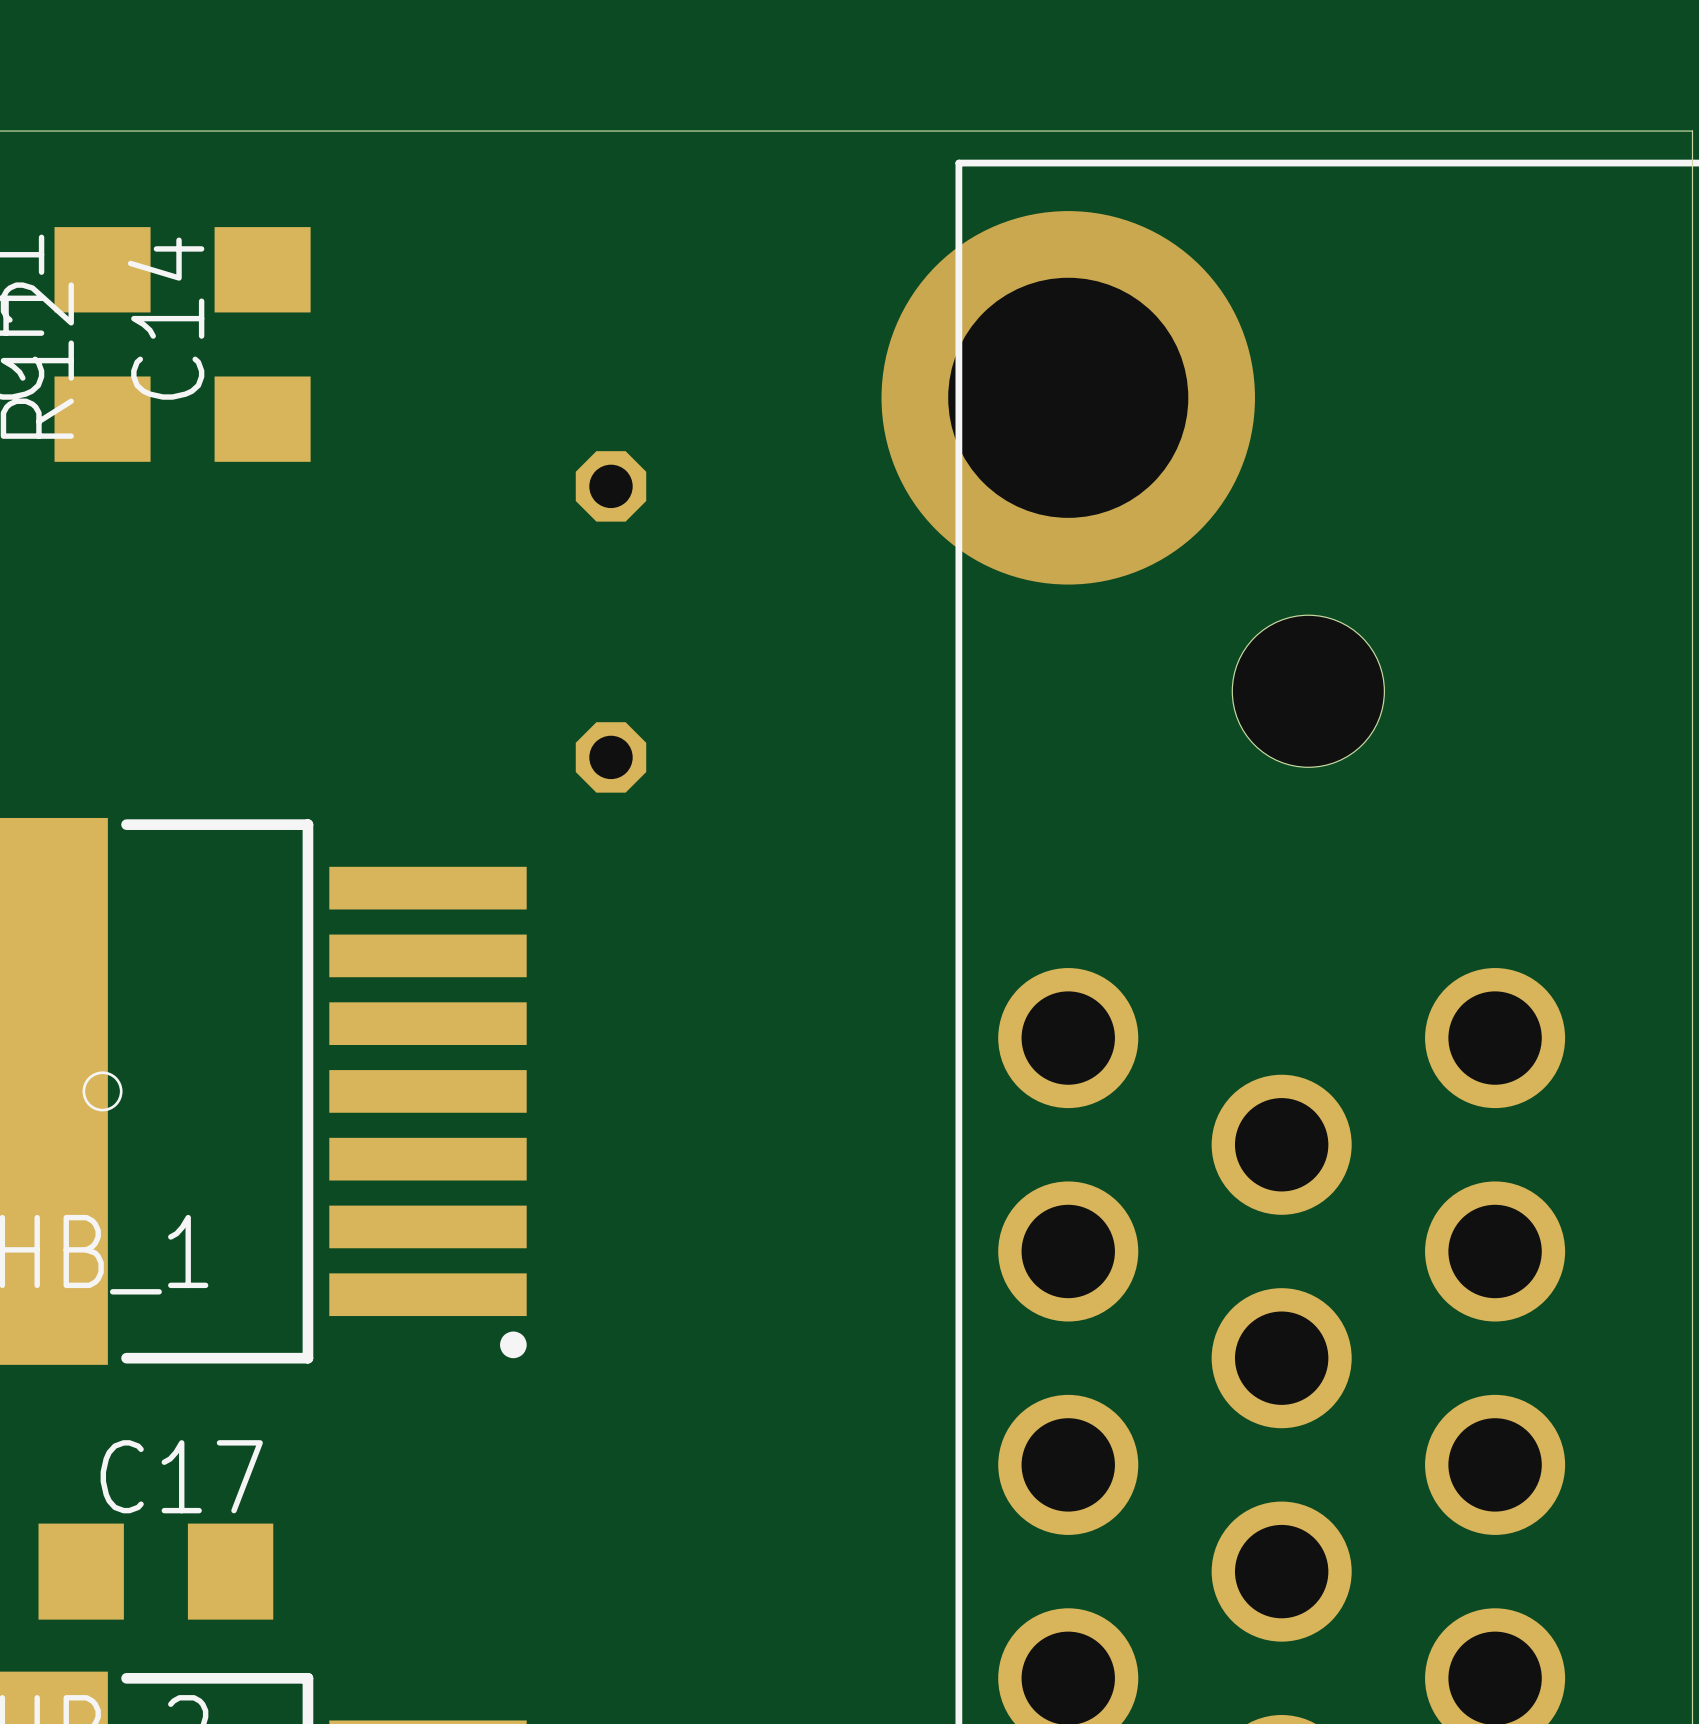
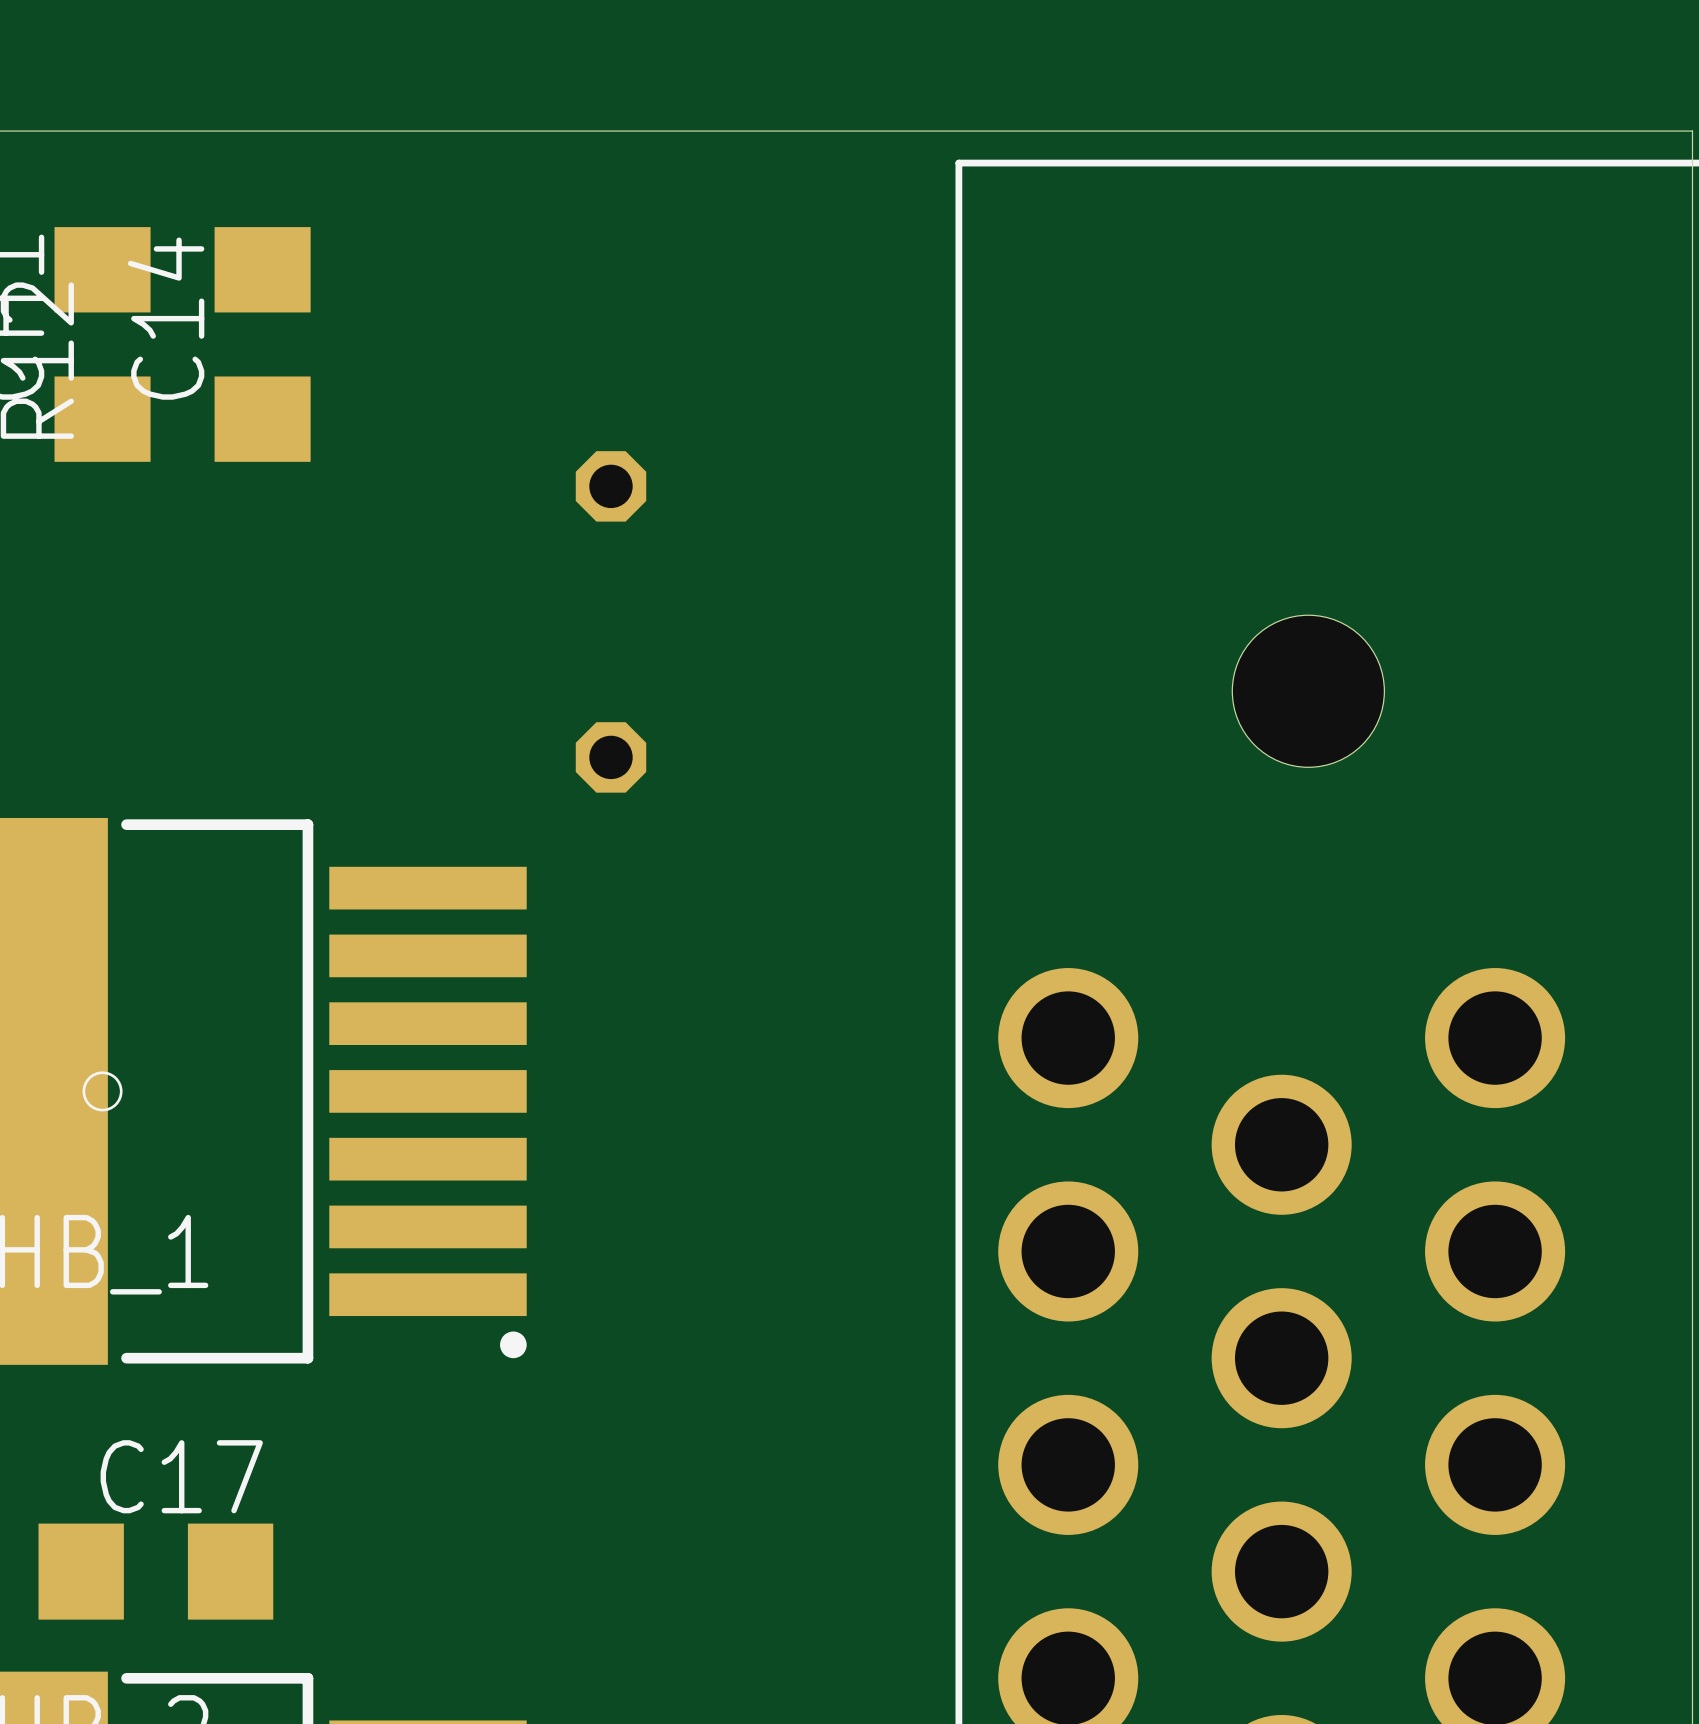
via: (1068, 397) -> none

